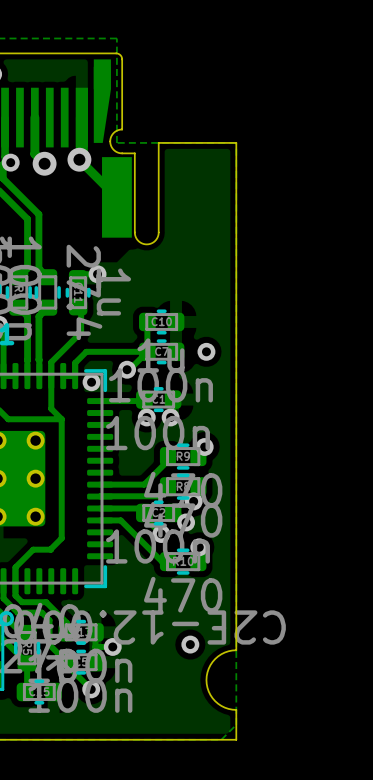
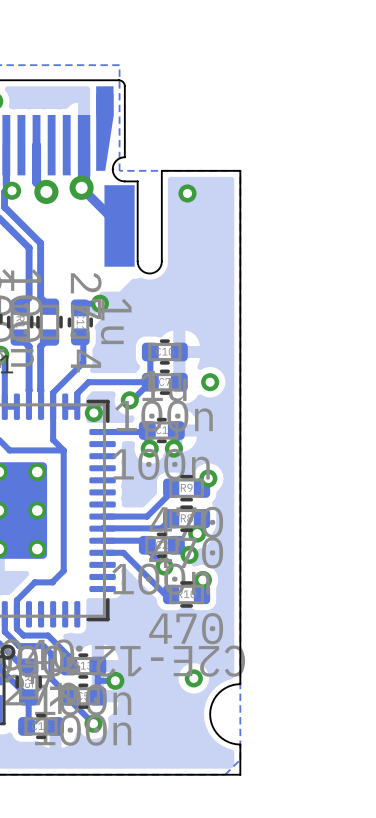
via: none -> (187, 193)

